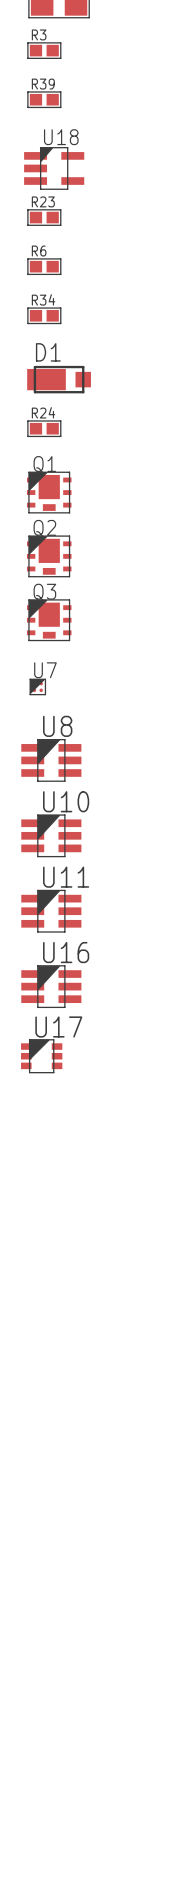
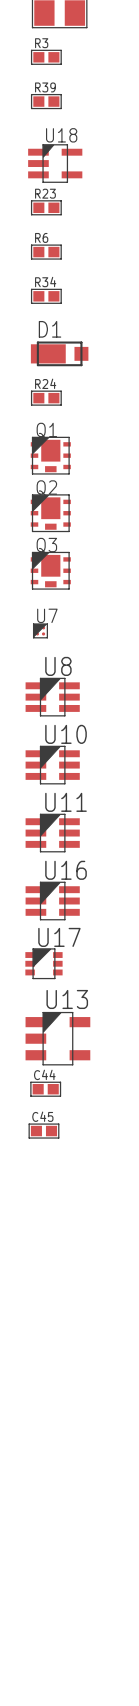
U13: none -> (57, 1038)
C44: none -> (45, 1089)
C45: none -> (43, 1131)

